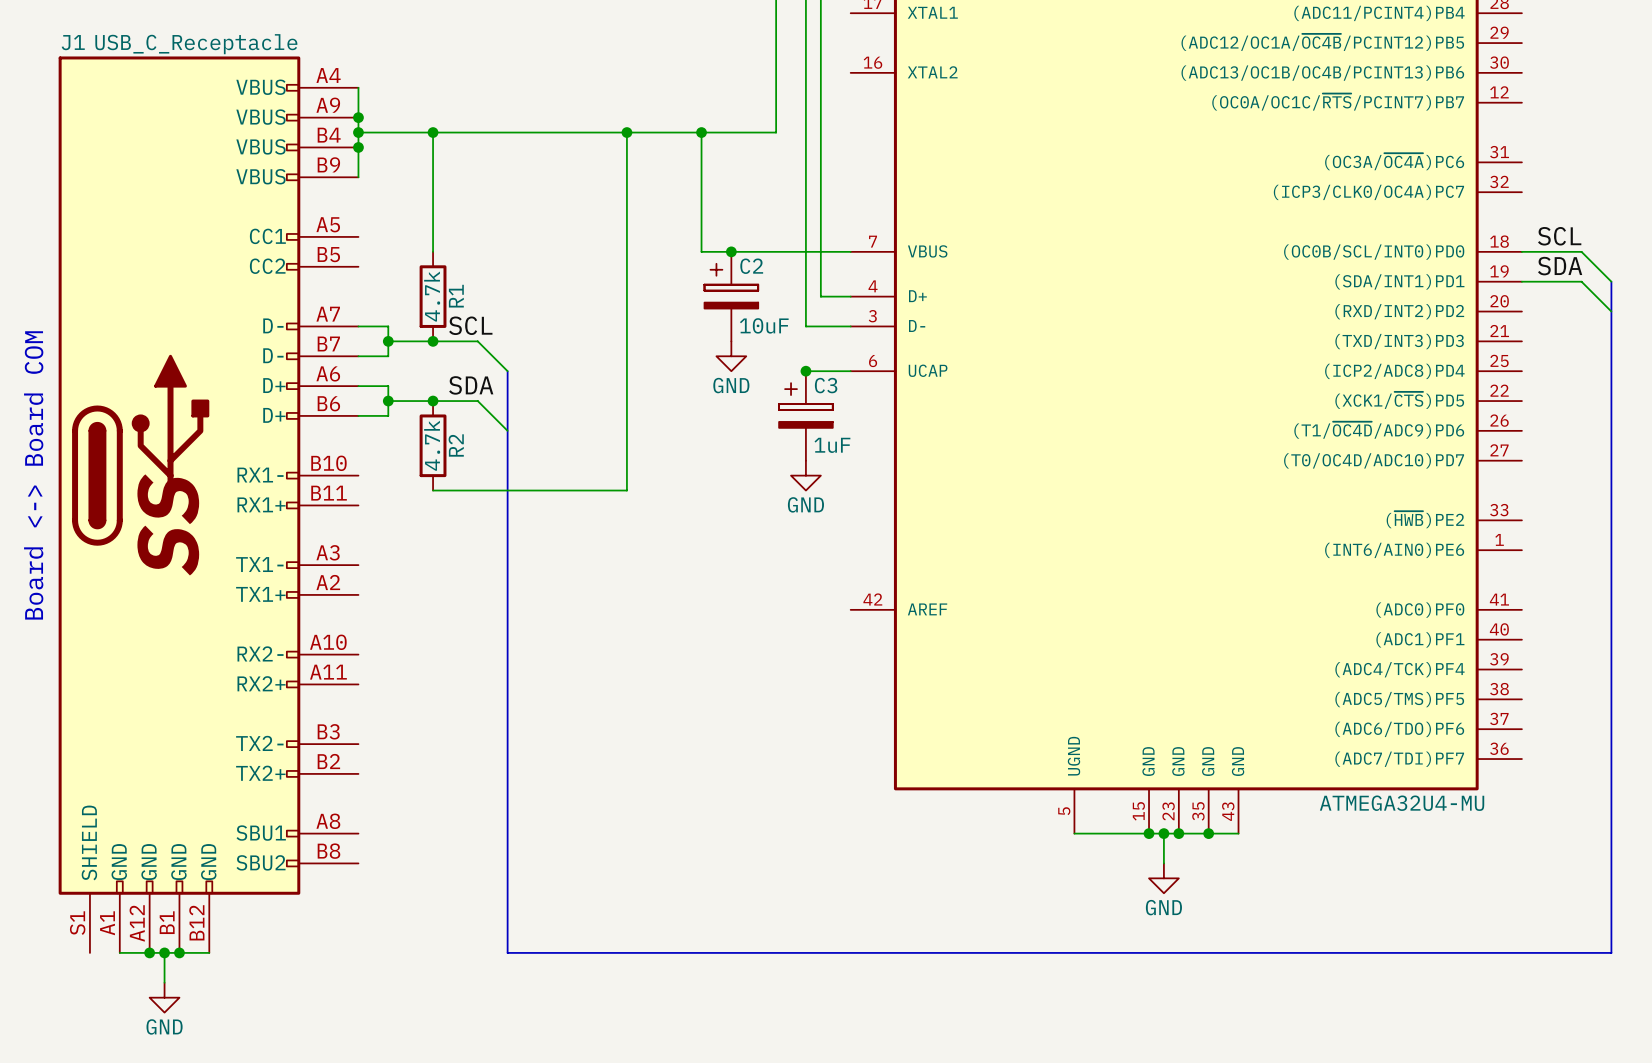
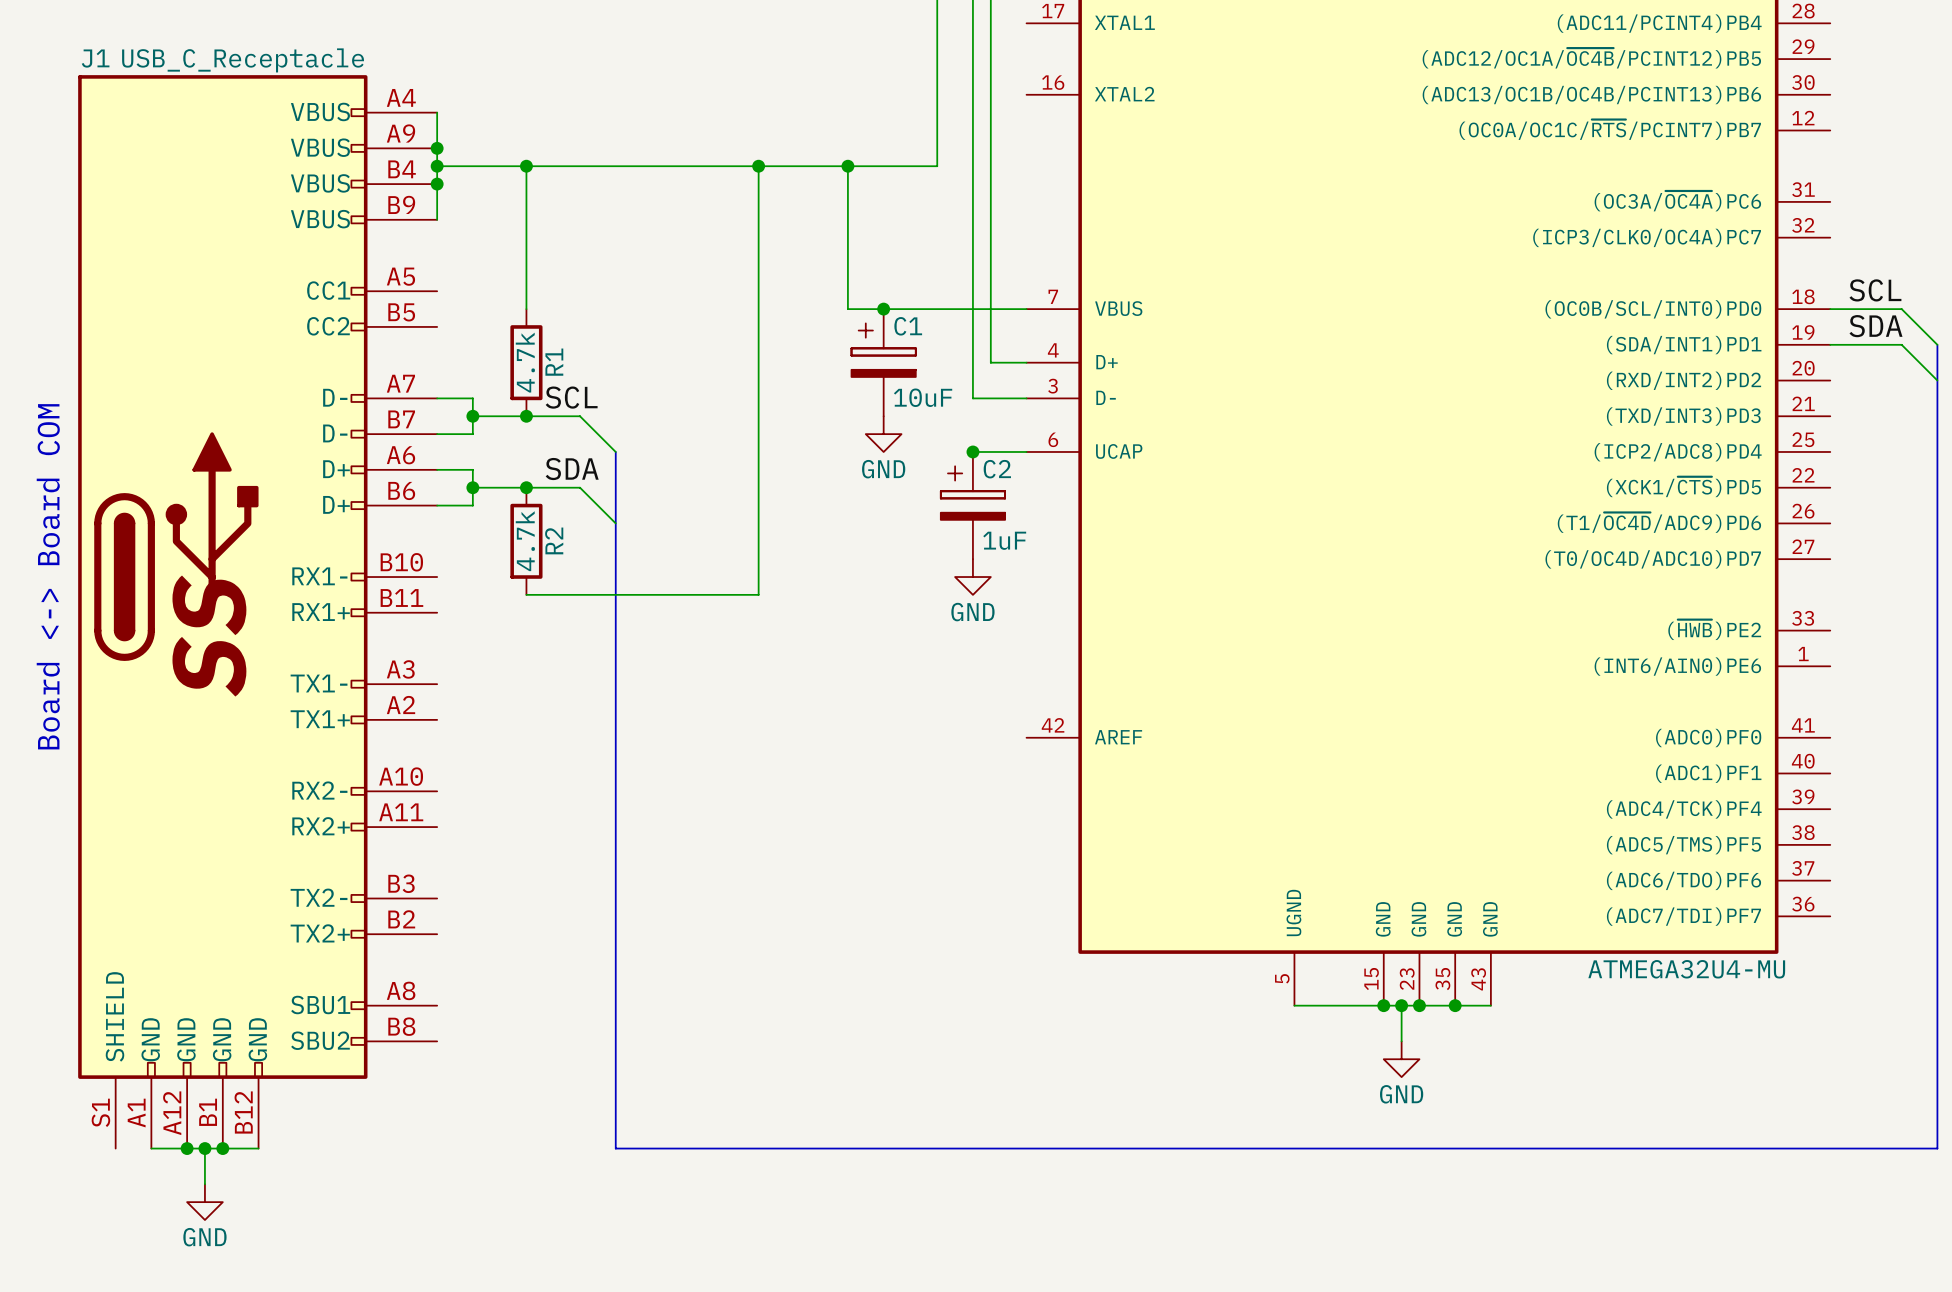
C2 name: C2 (751, 266) -> C1 (908, 326)
C3 name: C3 (826, 385) -> C2 (997, 469)

